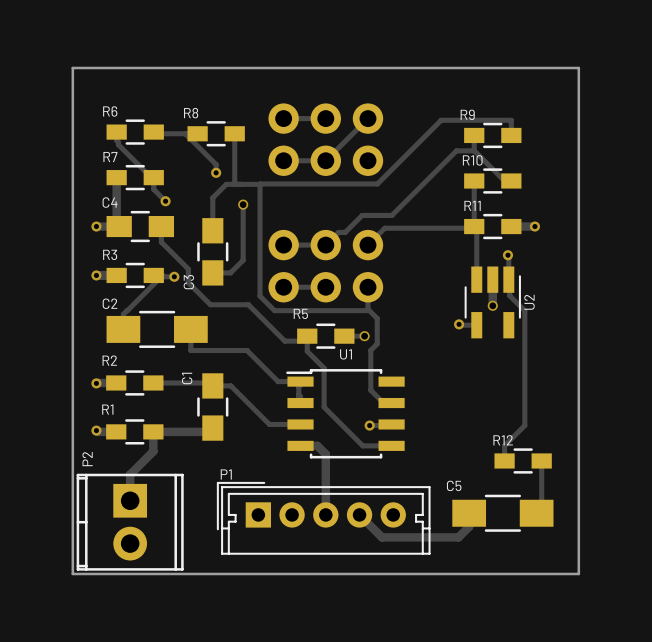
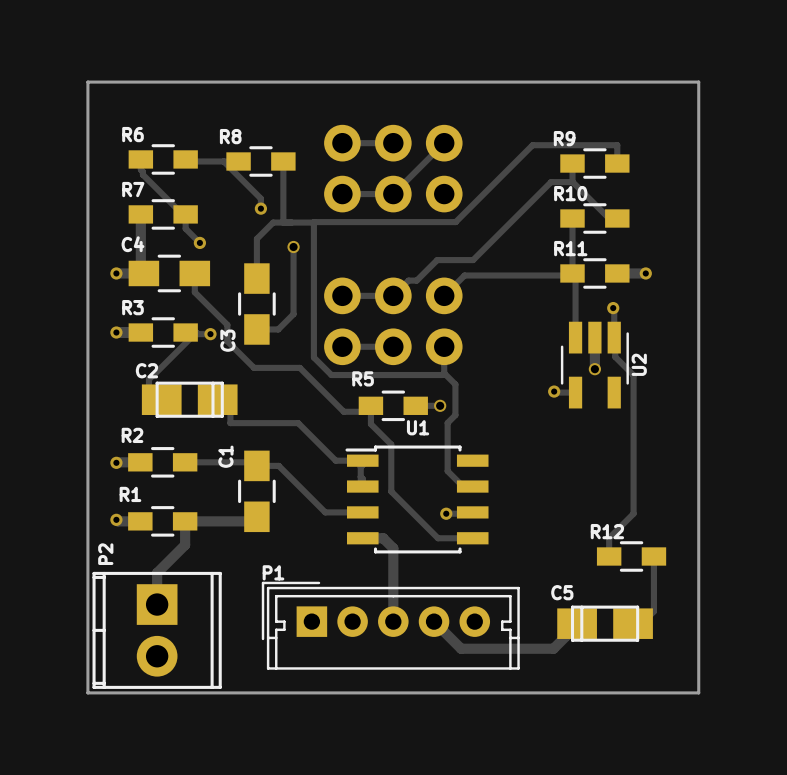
C2 footprint: [106, 310, 208, 348] -> [141, 381, 238, 418]
C5 footprint: [452, 494, 554, 532] -> [557, 605, 653, 642]

